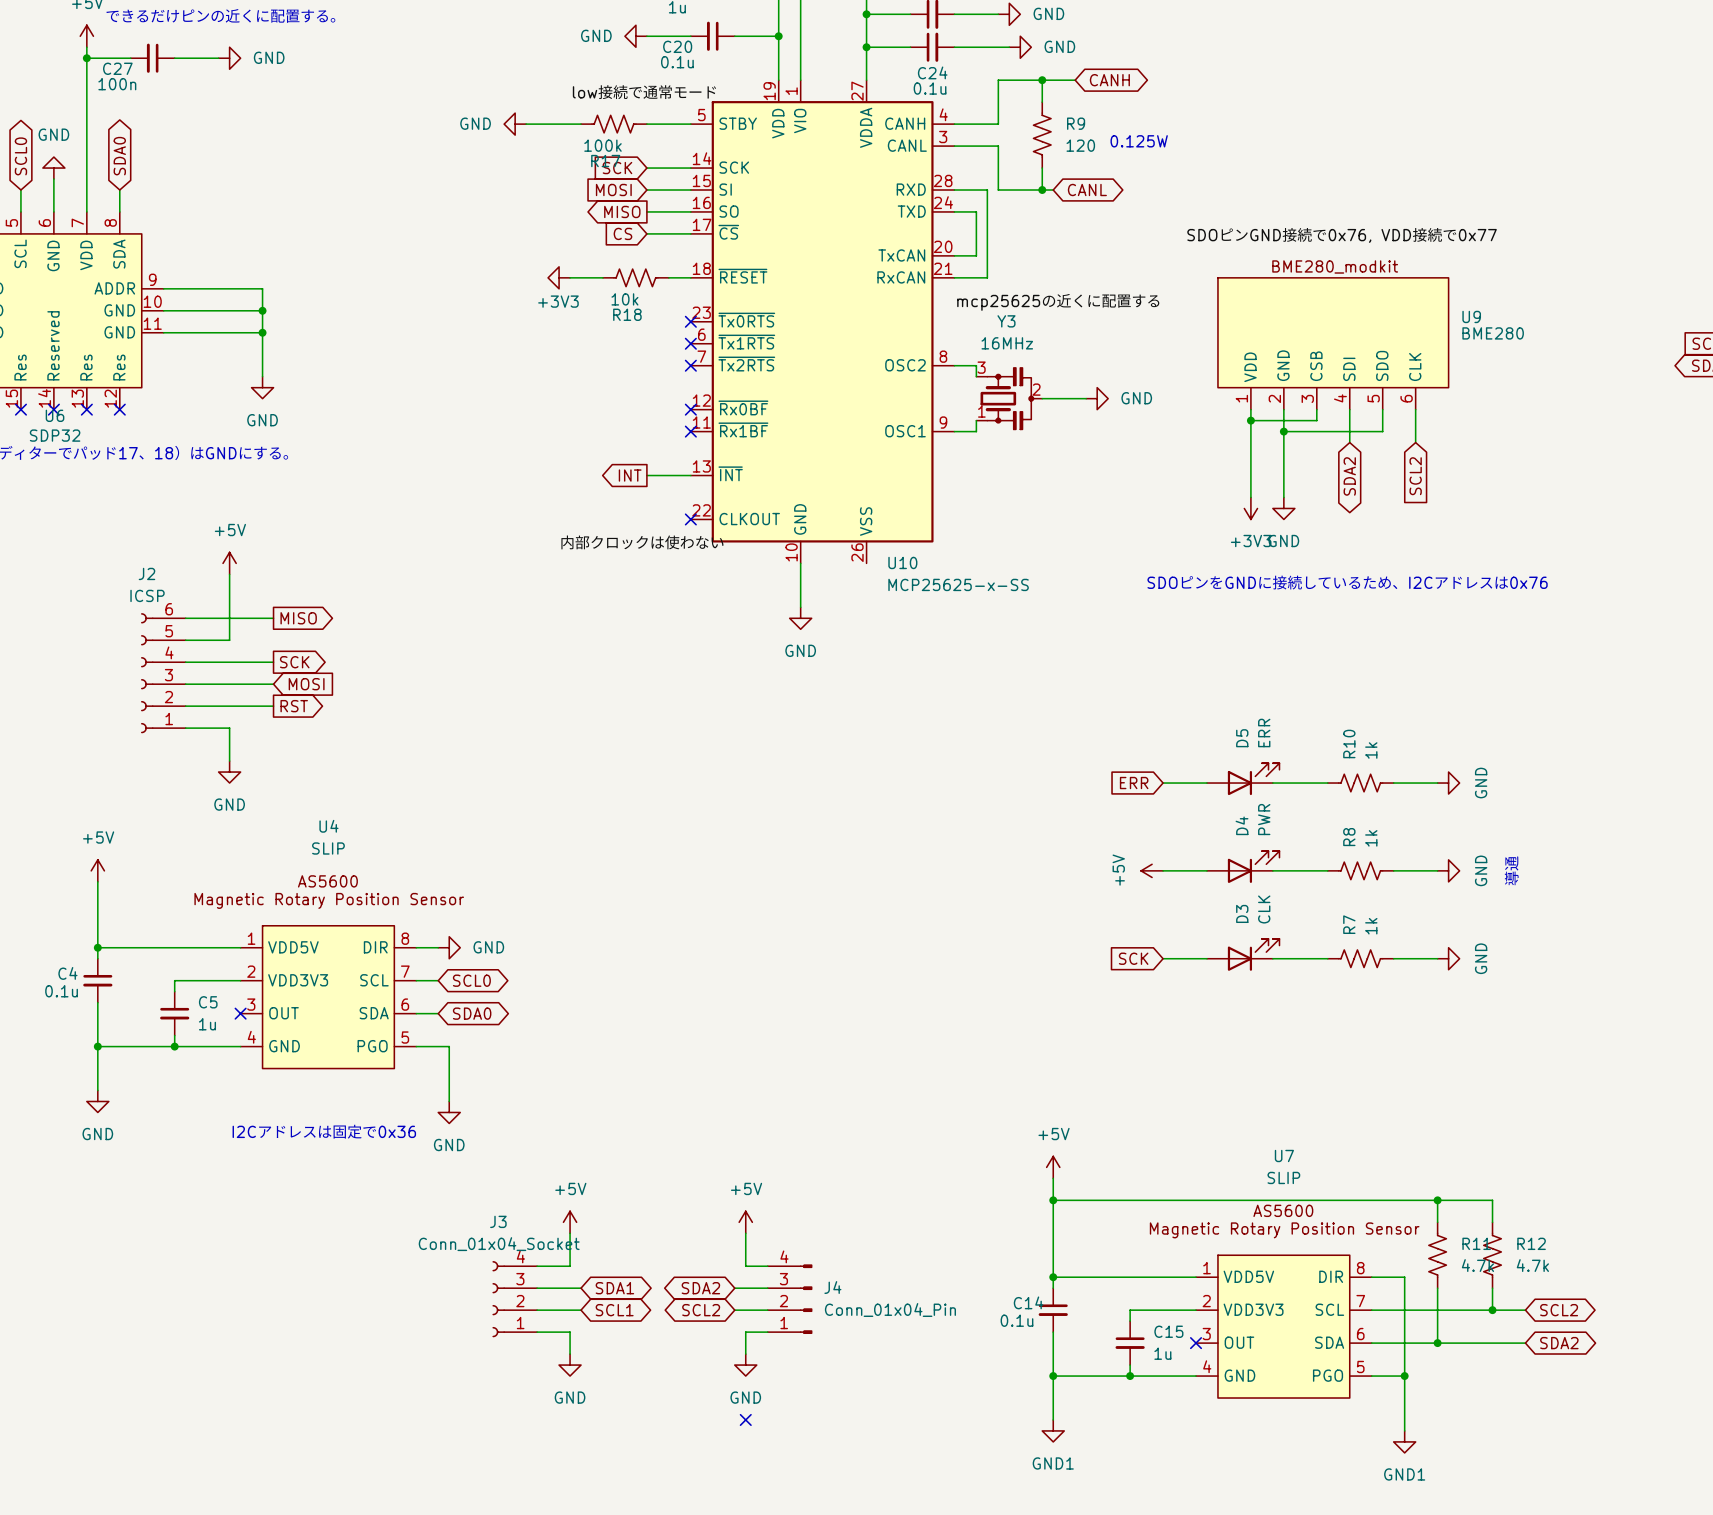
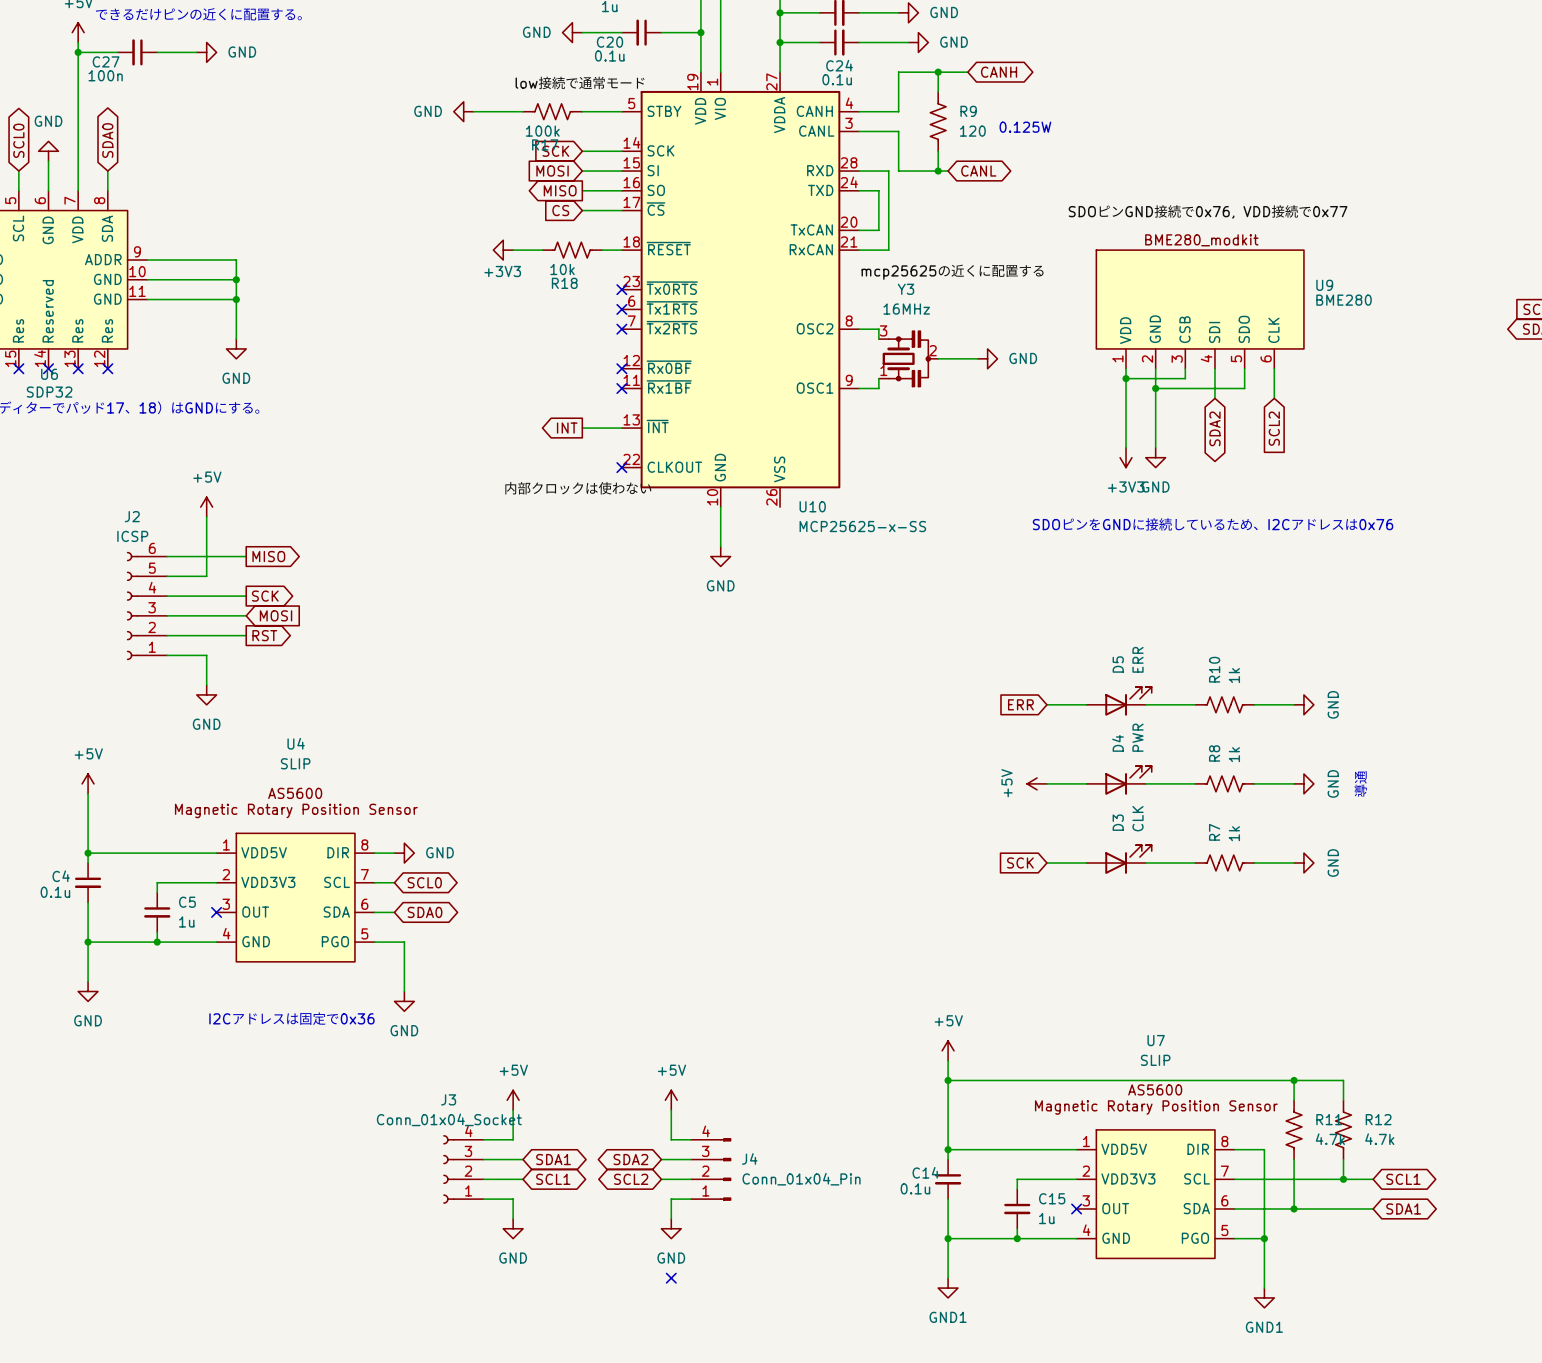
global label: SCL2 (1559, 1310) -> SCL1 (1403, 1179)
global label: SDA2 (1559, 1343) -> SDA1 (1403, 1208)

